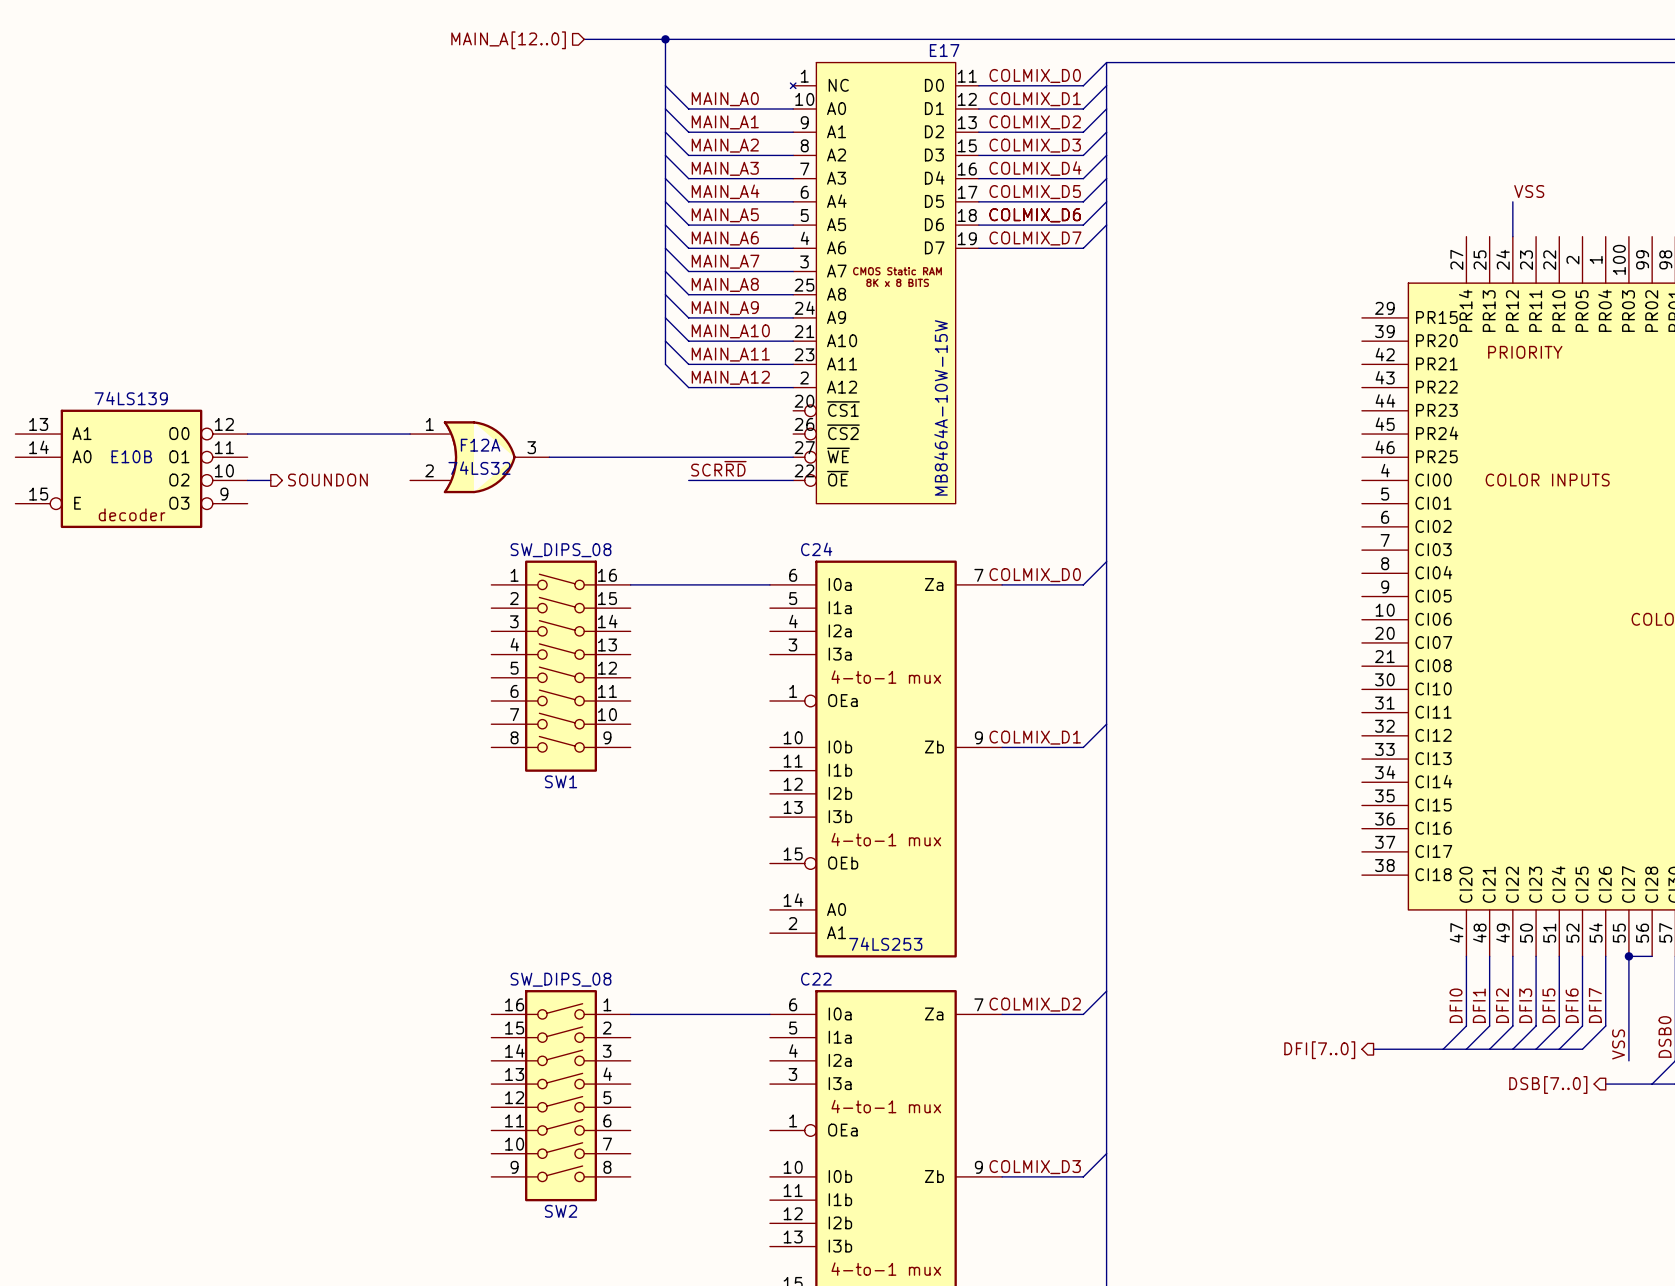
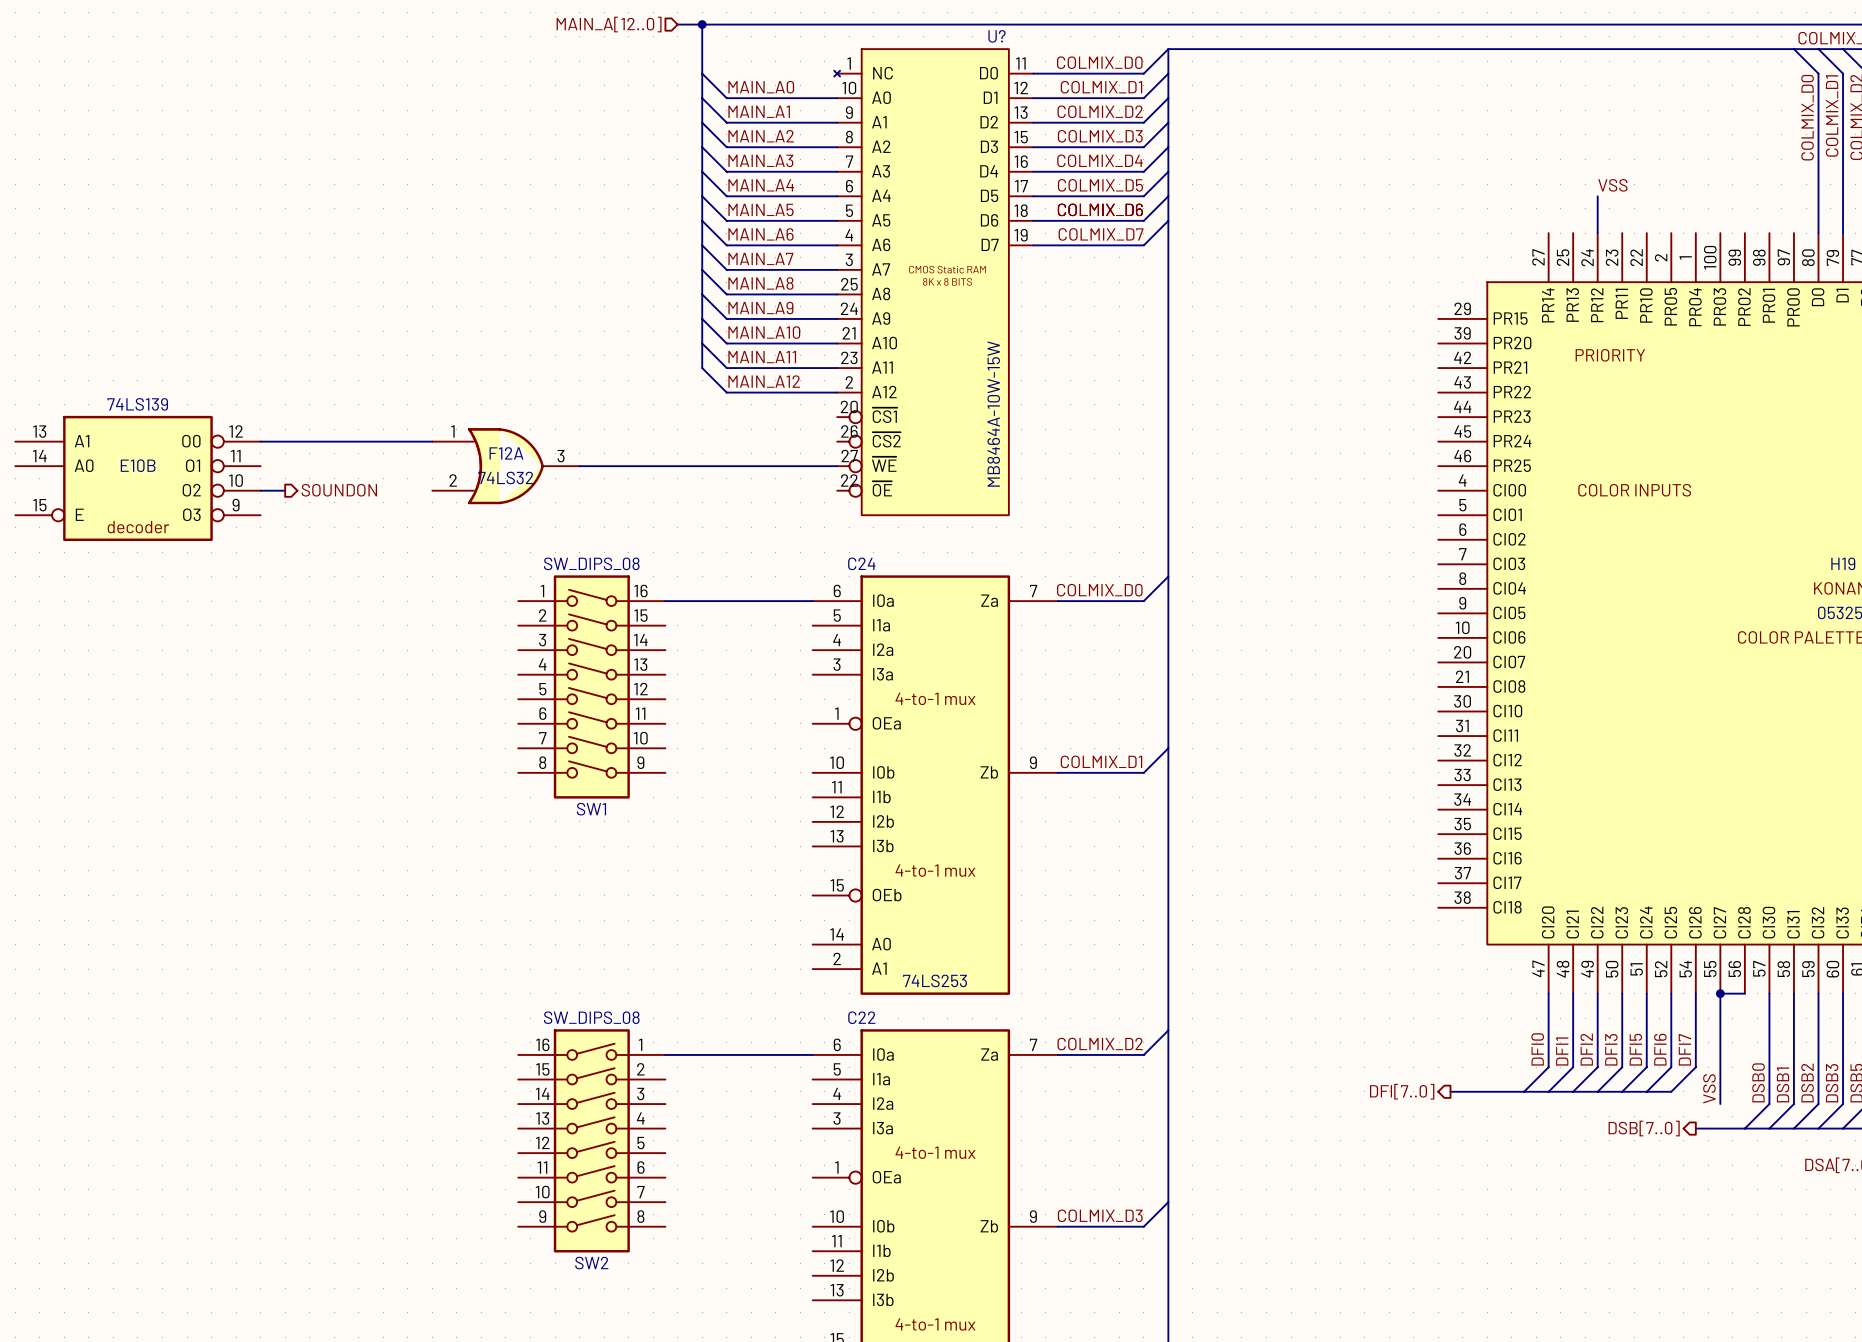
bus: (584, 39) (642, 39) -> none
hierarchical label position: MAIN_A[12..0] (508, 40) -> MAIN_A[12..0] (609, 24)
E17 name: E17 (944, 50) -> U? (997, 36)
label: SCR~{RD} (718, 468) -> none
wire: (688, 480) (793, 480) -> none

